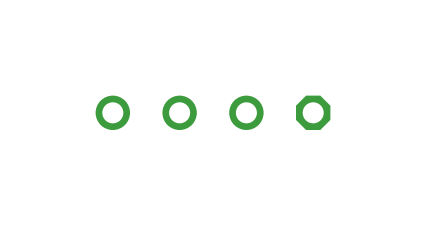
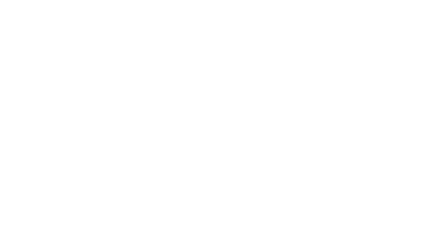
part: (213, 112) -> none

